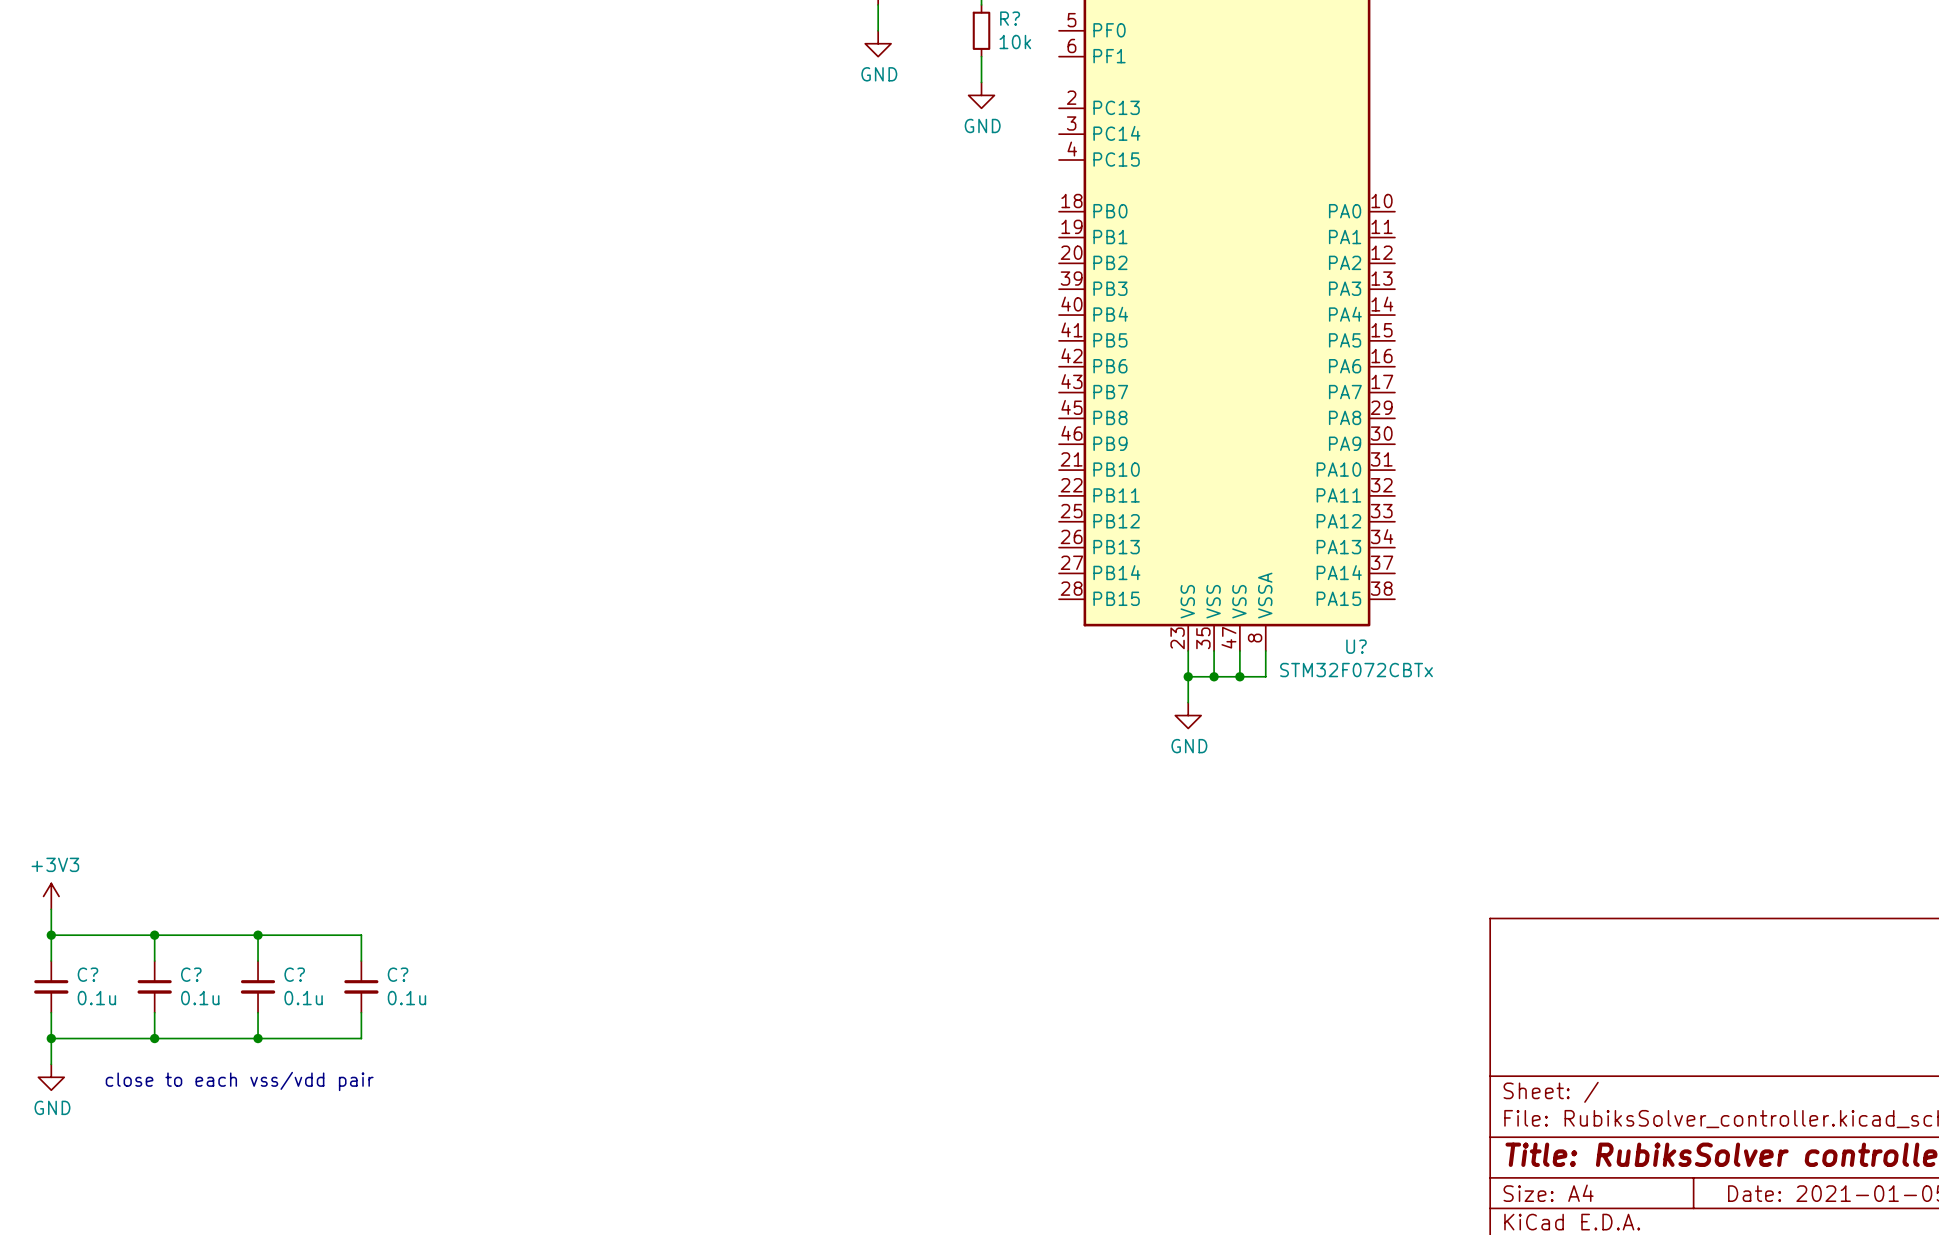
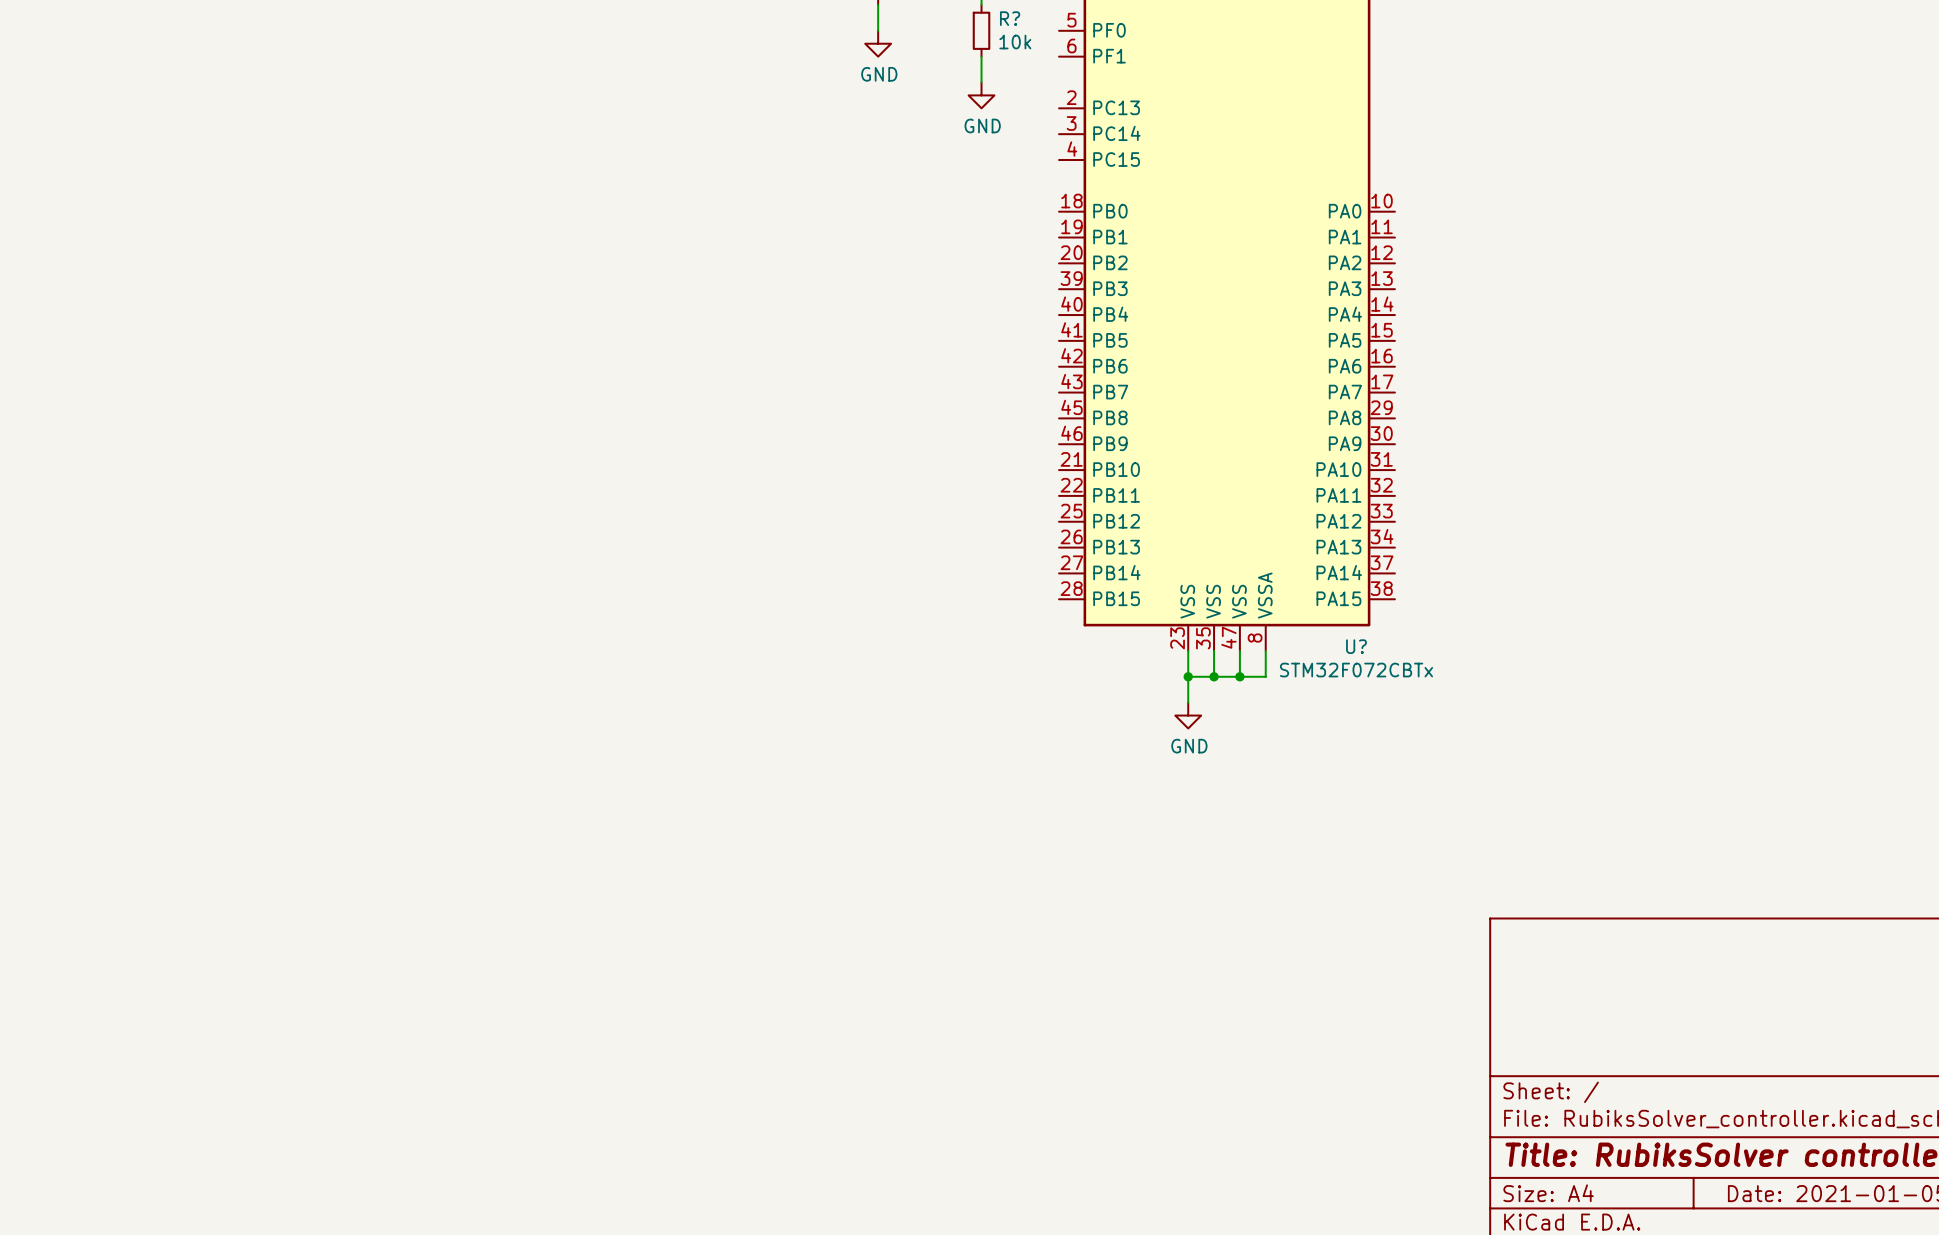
power symbol: +3V3 (51, 896) -> none
wire: (51, 909) (51, 961) -> none
wire: (51, 935) (361, 935) (361, 961) -> none
junction: (51, 935) -> none
wire: (154, 935) (154, 961) -> none
junction: (154, 935) -> none
wire: (258, 935) (258, 961) -> none
junction: (258, 935) -> none
C?: 0.1u (51, 986) -> none
C?: 0.1u (154, 986) -> none
C?: 0.1u (258, 986) -> none
C?: 0.1u (361, 986) -> none
wire: (51, 1012) (51, 1064) -> none
wire: (154, 1012) (154, 1038) -> none
wire: (258, 1012) (258, 1038) -> none
wire: (361, 1012) (361, 1038) (51, 1038) -> none
junction: (51, 1038) -> none
junction: (154, 1038) -> none
junction: (258, 1038) -> none
power symbol: GND (51, 1077) -> none
text: close to each vss/vdd pair (239, 1081) -> none

